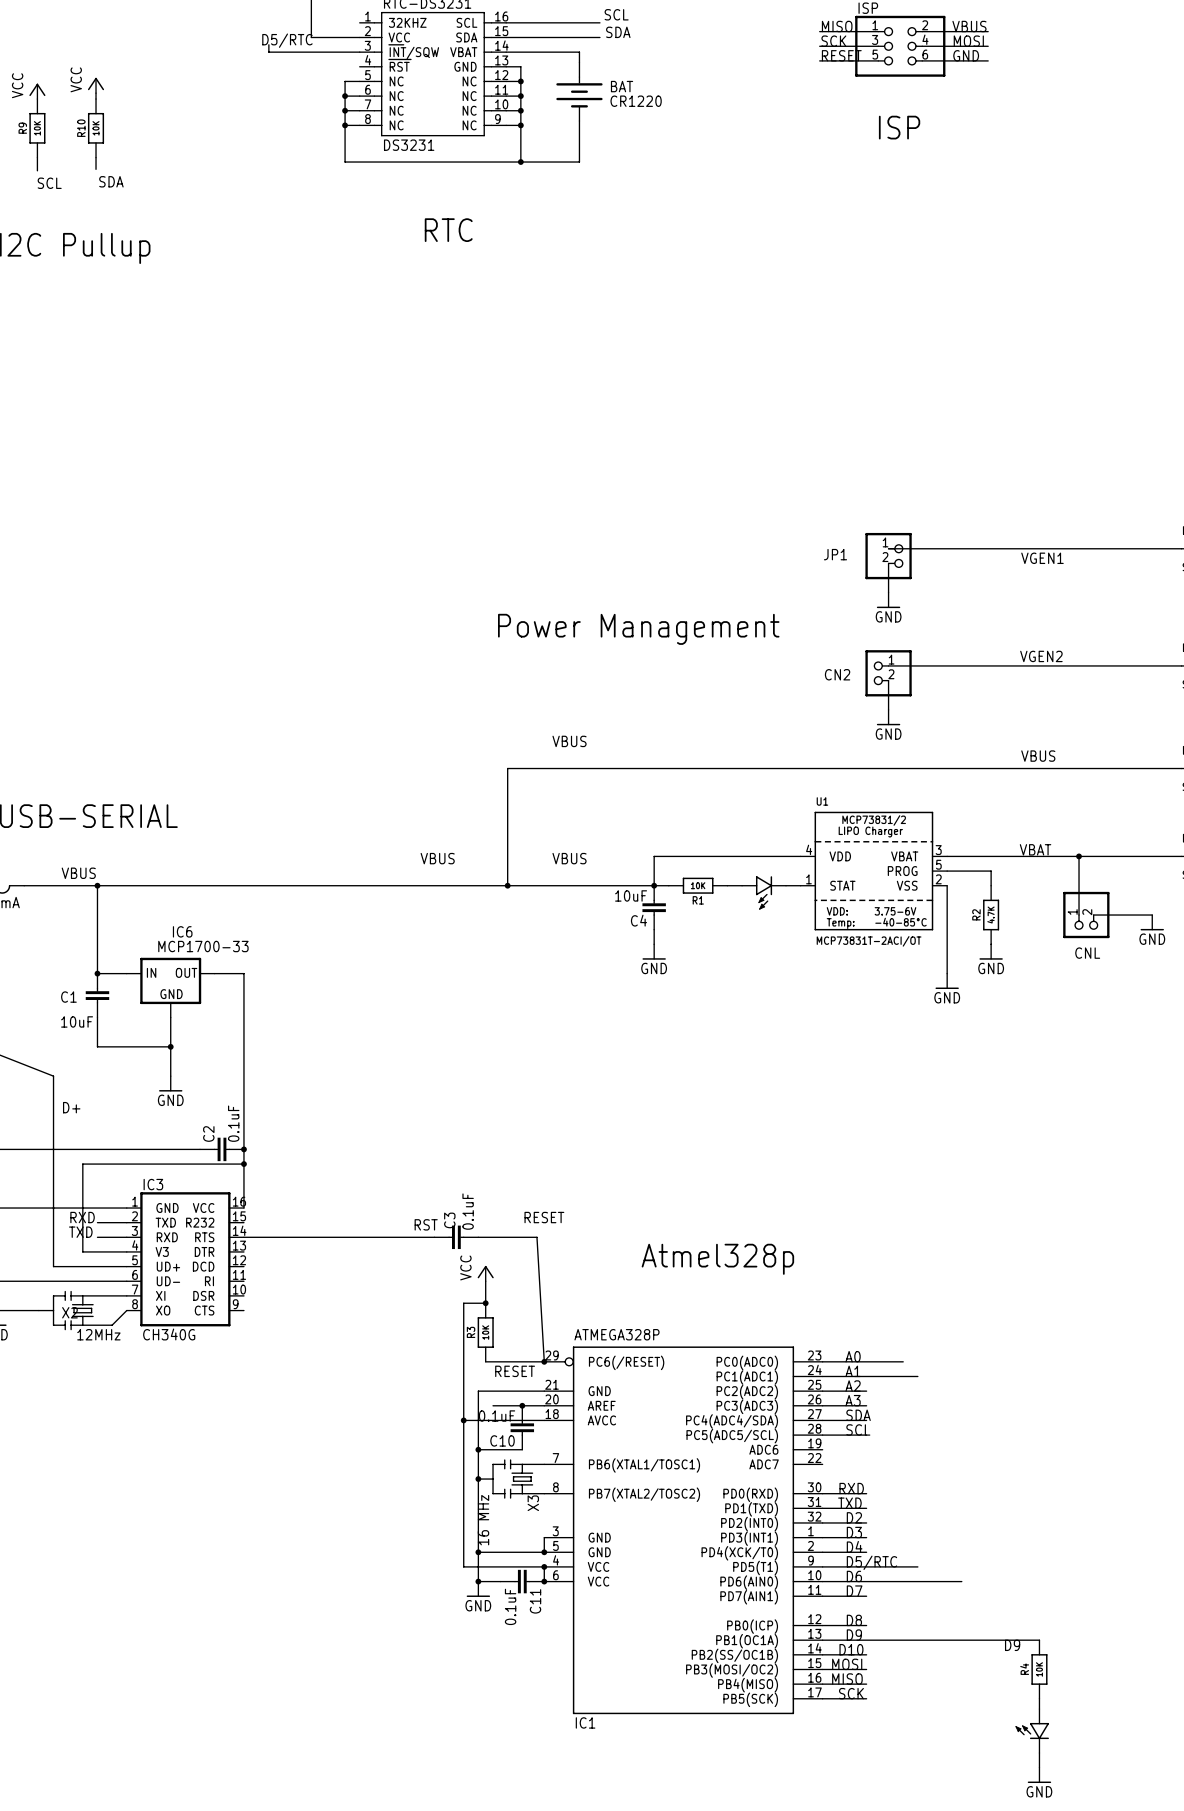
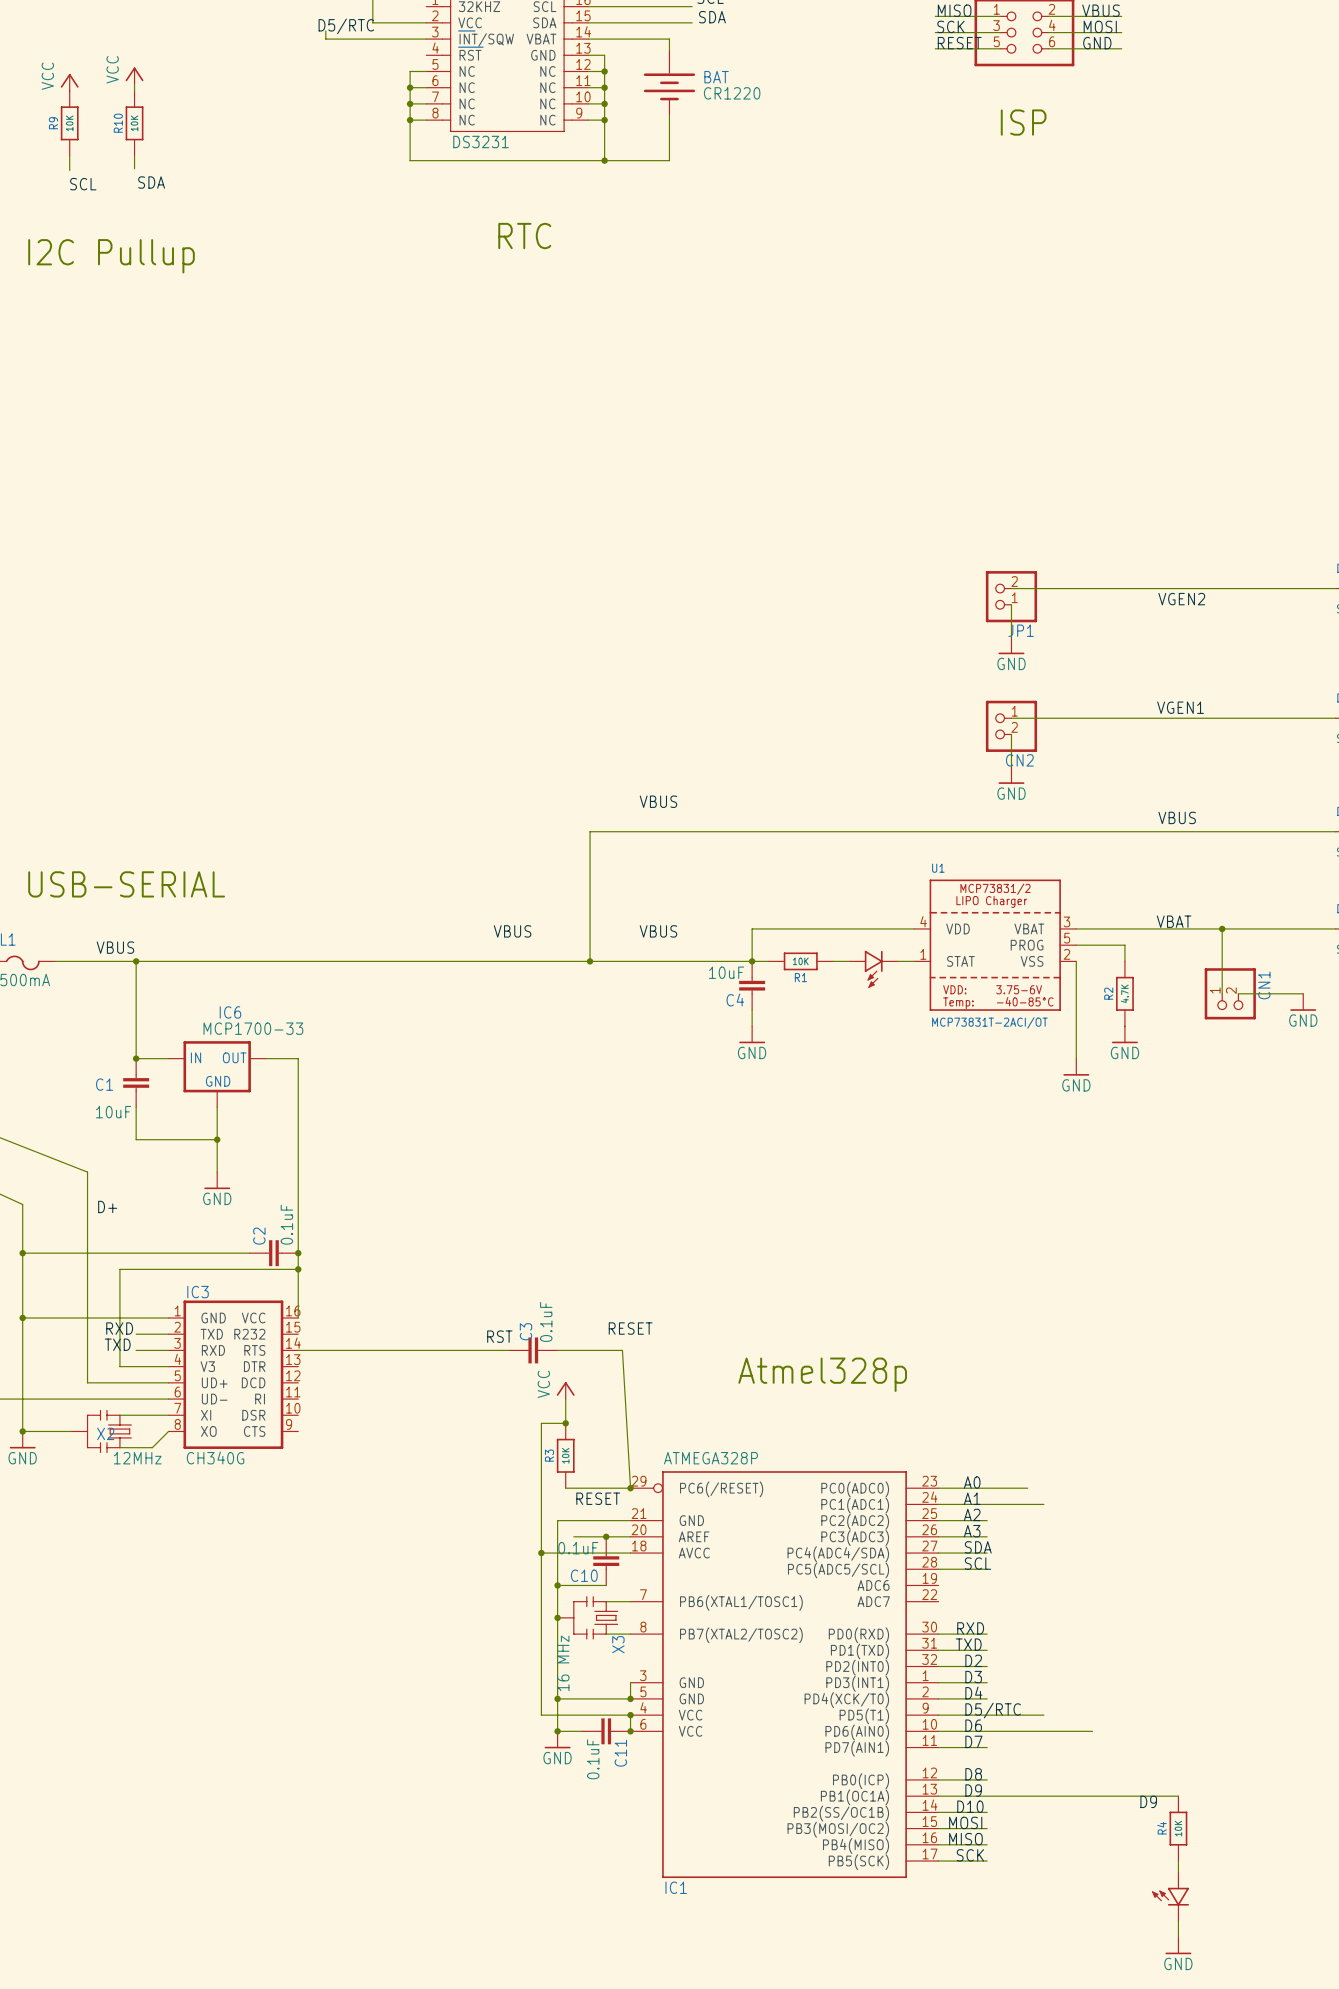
JP1 name position: JP1 (835, 554) -> JP1 (1021, 630)
JP1 rotation: 0° (888, 556) -> 180° (1011, 596)
label: VGEN1 (1042, 558) -> VGEN2 (1181, 599)
text: Power Management (638, 629) -> none
label: VGEN2 (1041, 656) -> VGEN1 (1180, 707)
CN2 name position: CN2 (837, 674) -> CN2 (1019, 760)
CNL name: CNL (1087, 953) -> CN1 (1264, 985)

